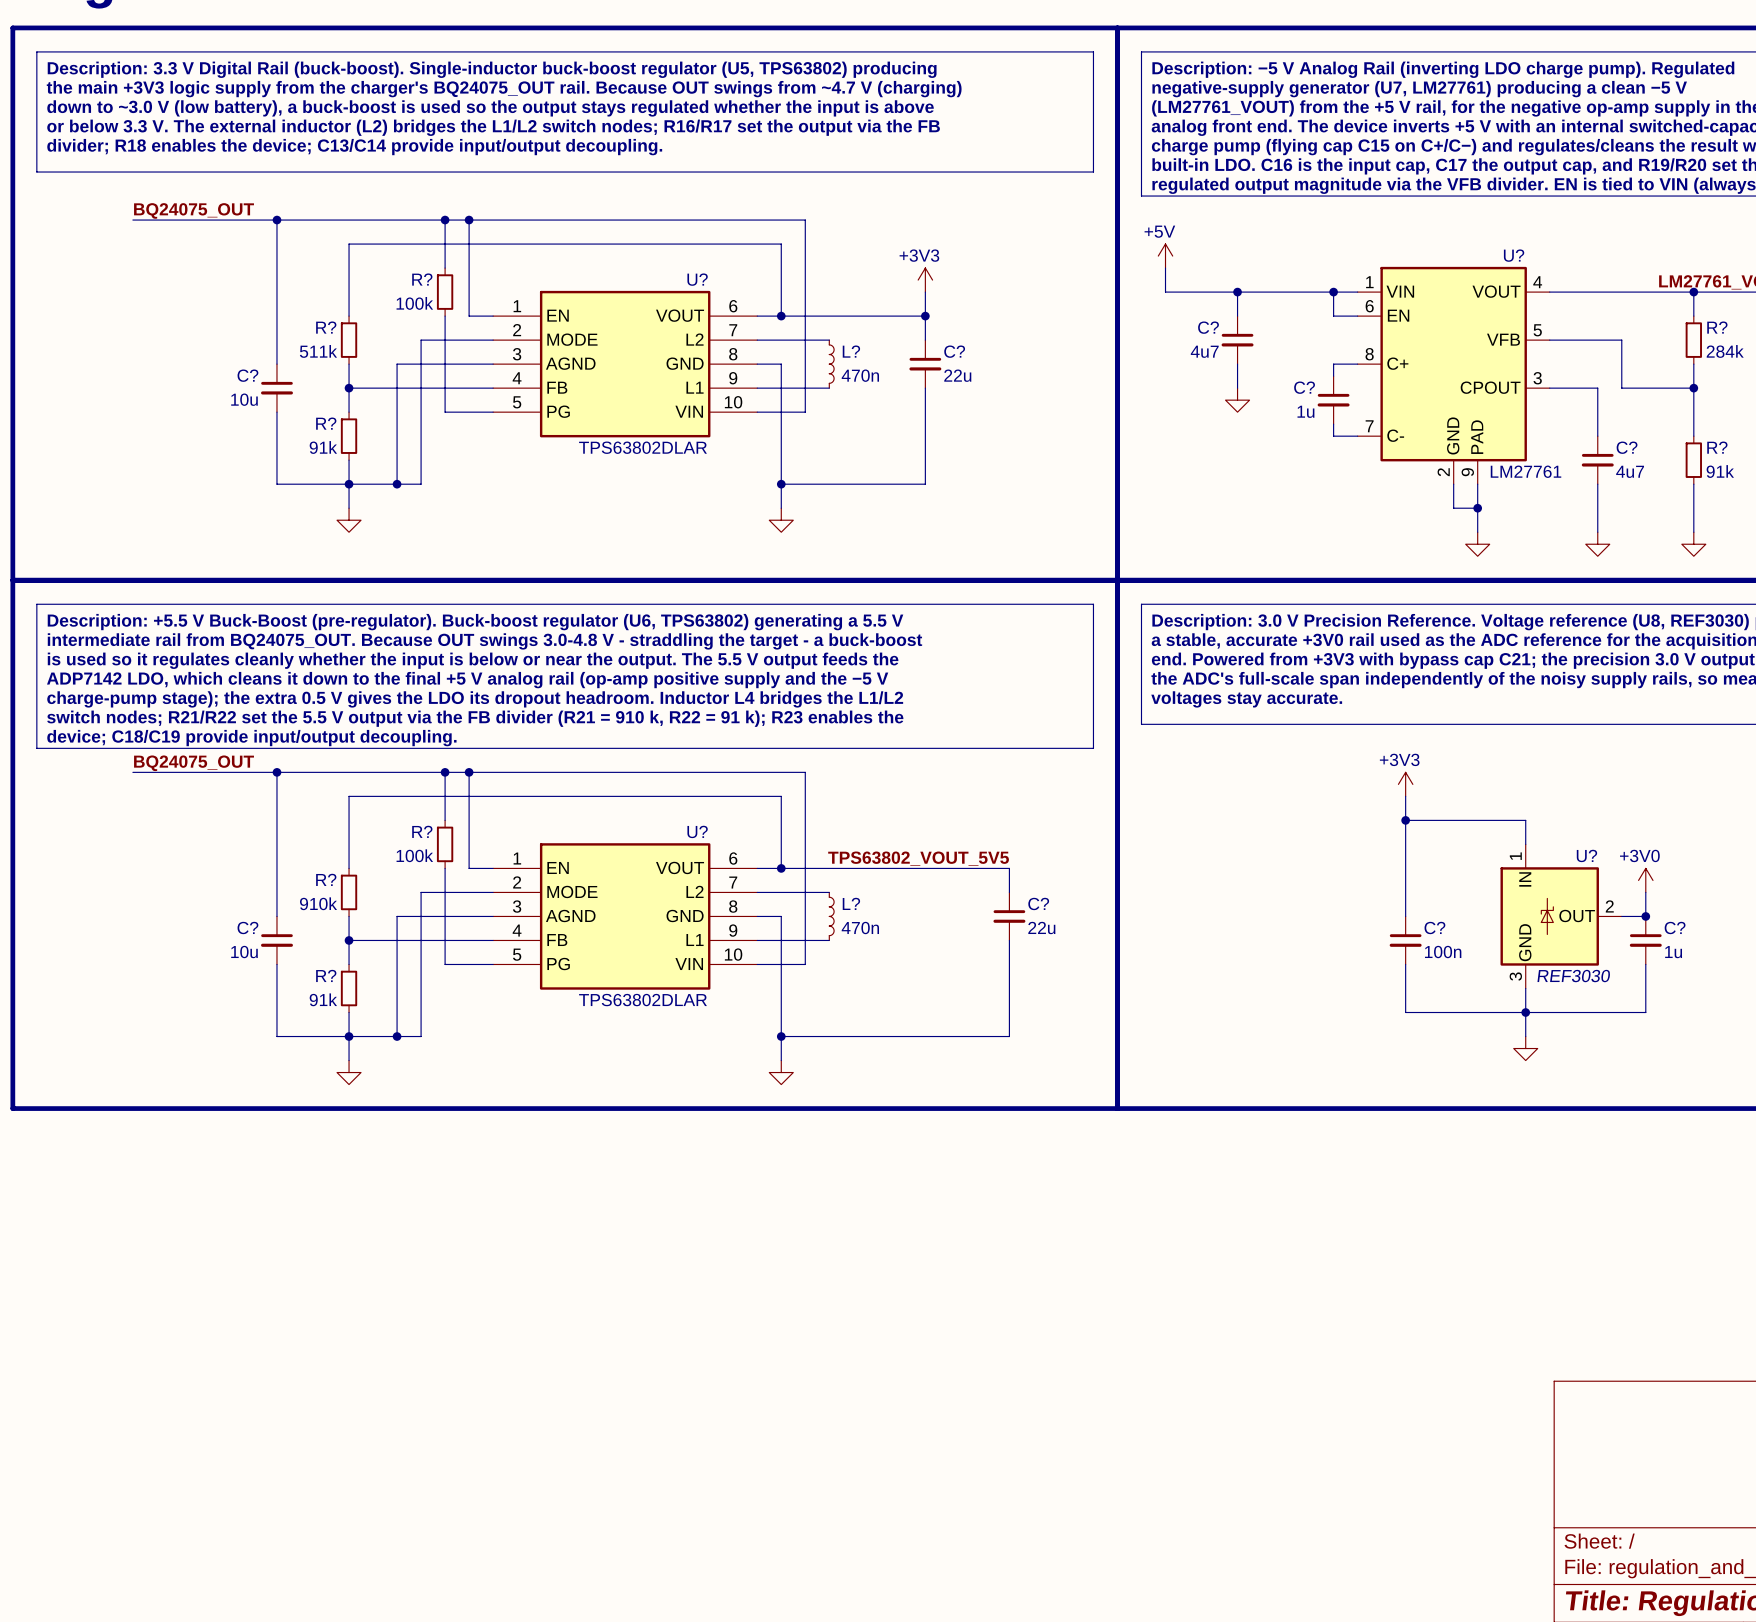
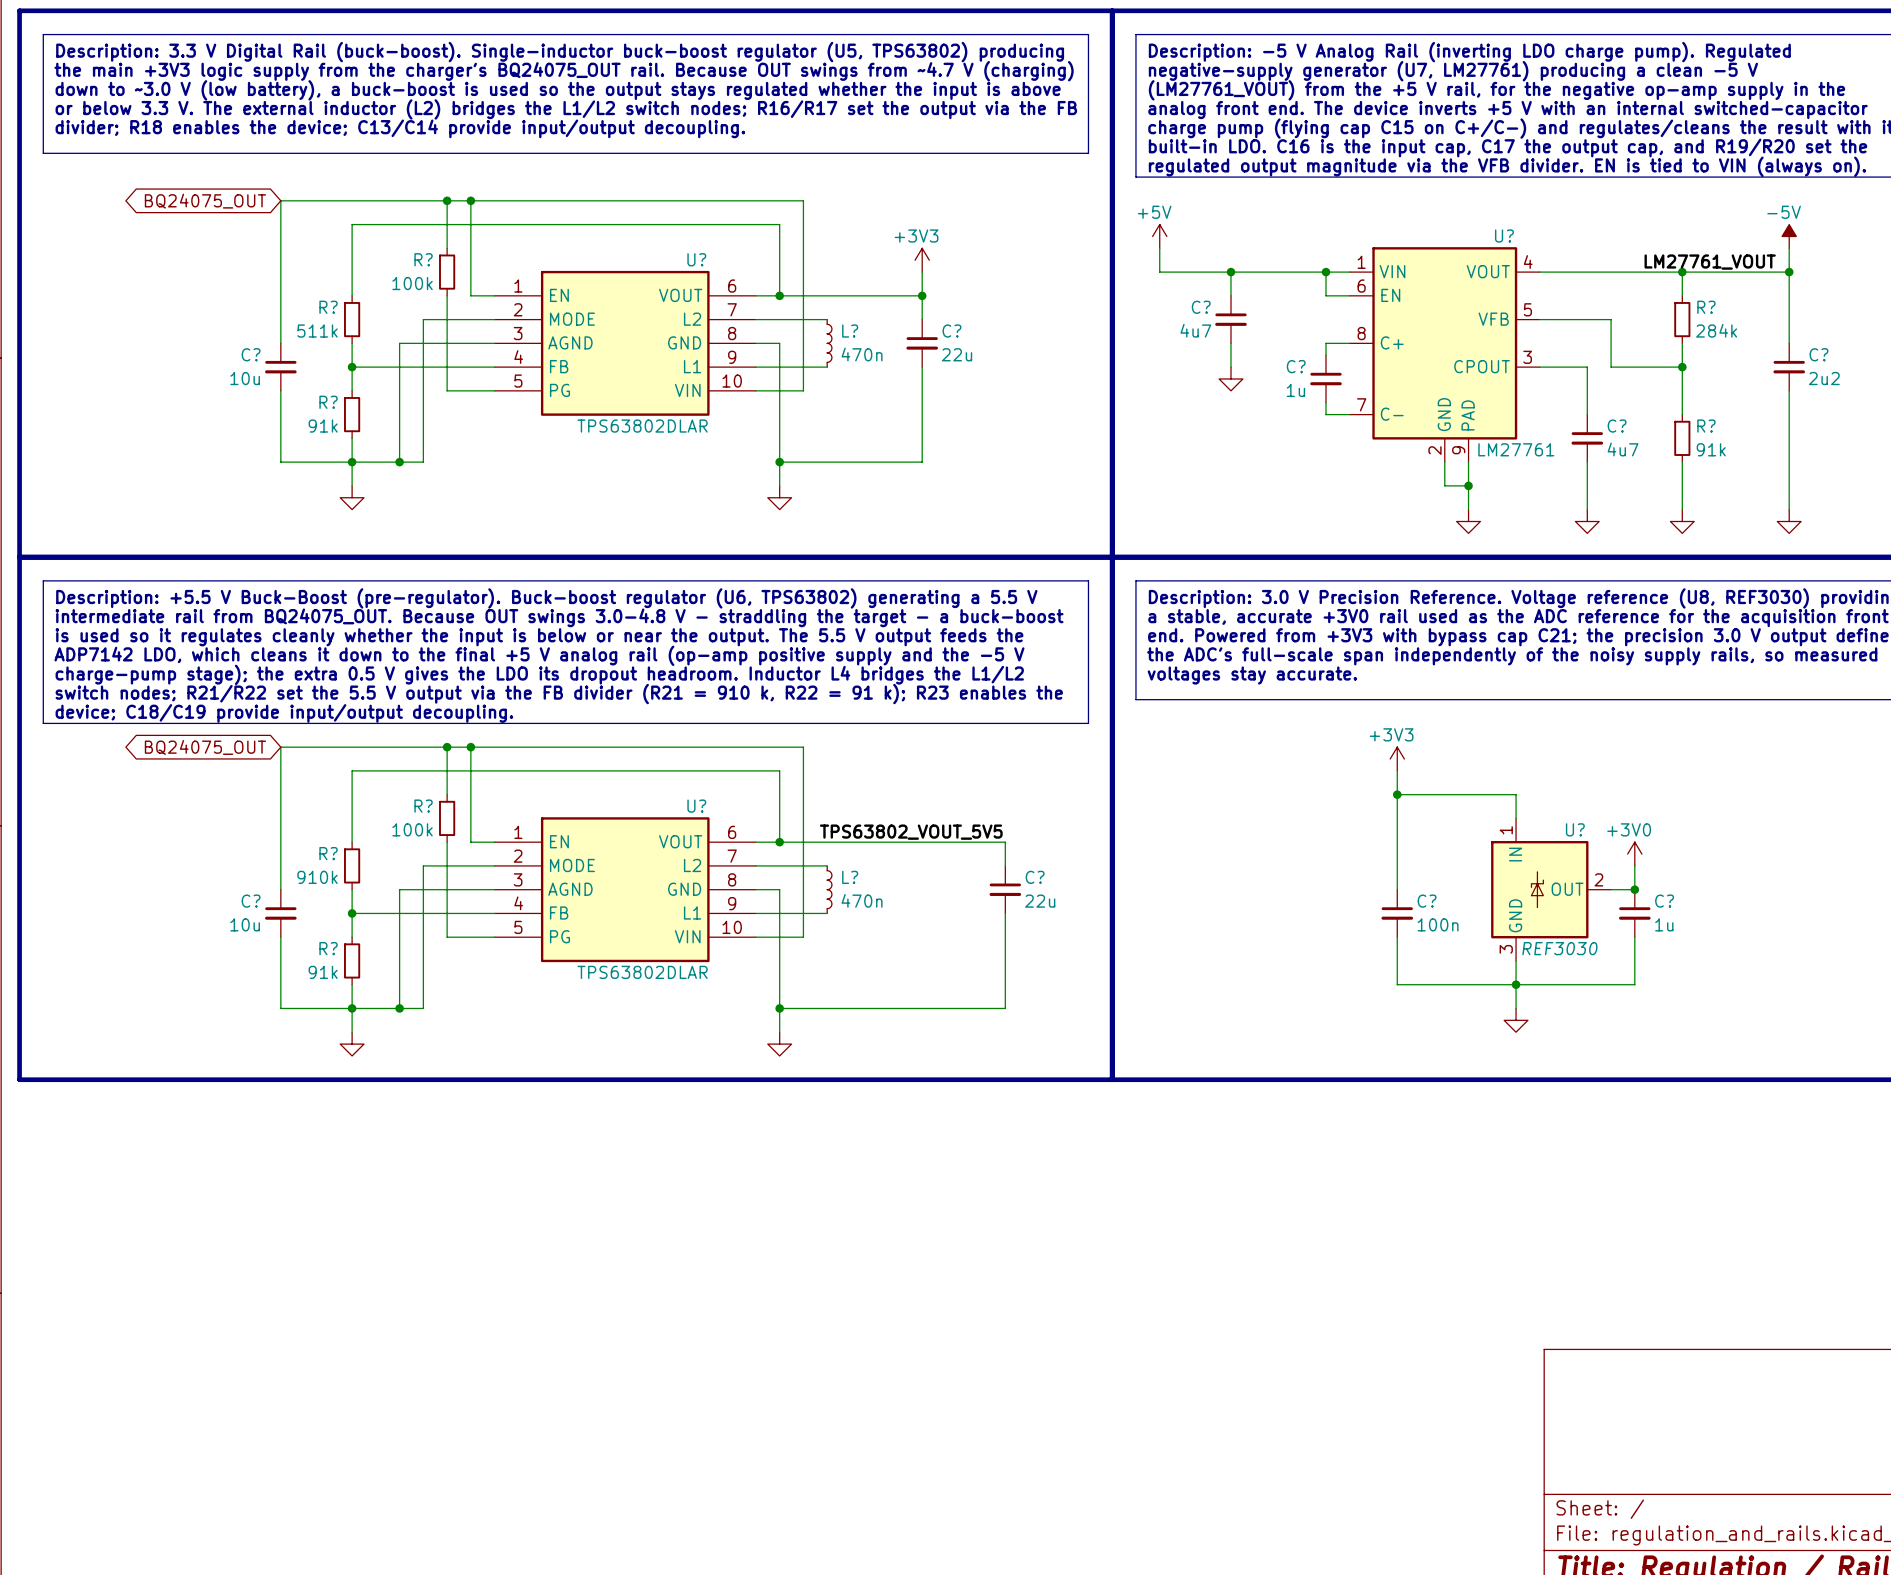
label: BQ24075_OUT (194, 210) -> none
wire: (132, 220) (276, 220) -> none
junction: (276, 220) -> none
global label: none -> BQ24075_OUT (205, 201)
label: BQ24075_OUT (194, 763) -> none
wire: (132, 772) (276, 772) -> none
junction: (276, 772) -> none
global label: none -> BQ24075_OUT (205, 747)

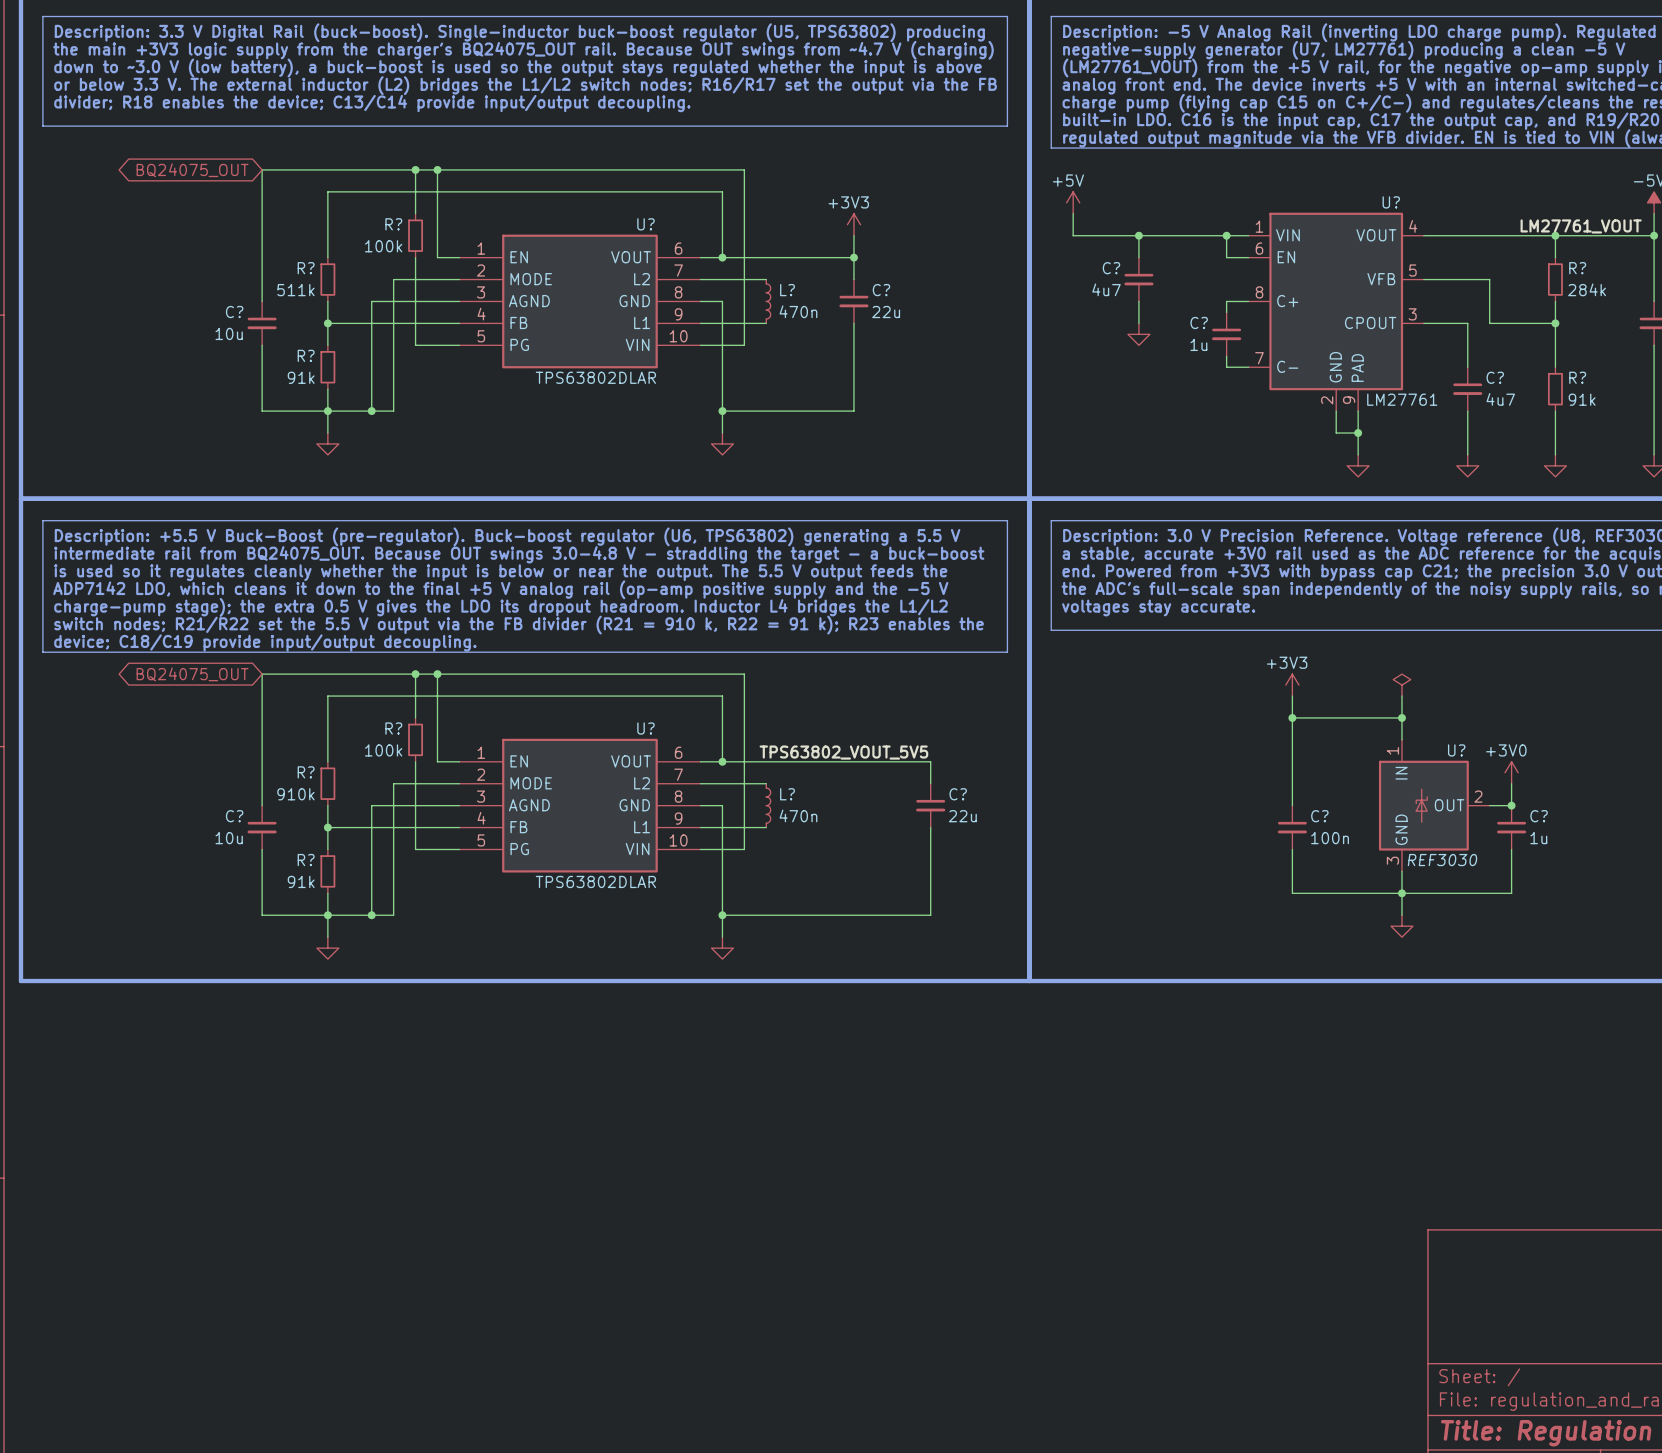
power symbol: none -> (1401, 685)
wire: none -> (1401, 696) (1401, 717)
junction: none -> (1401, 717)

